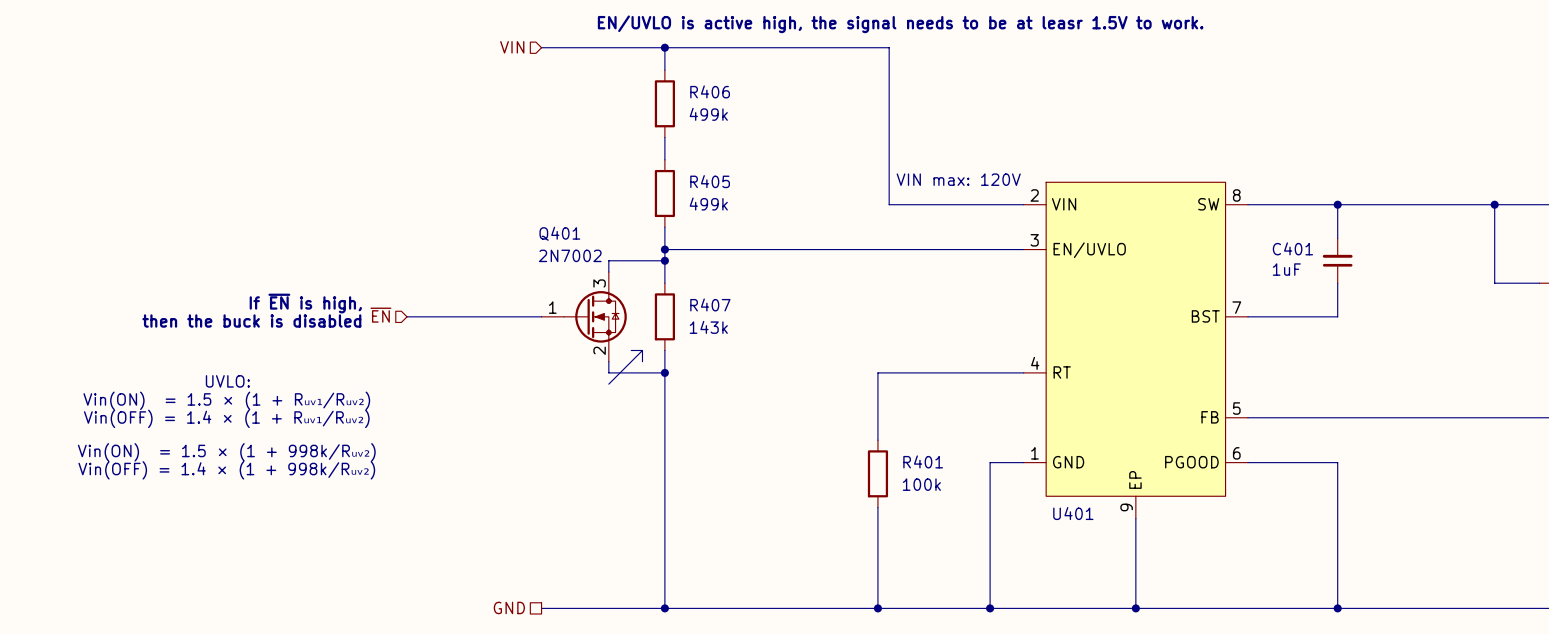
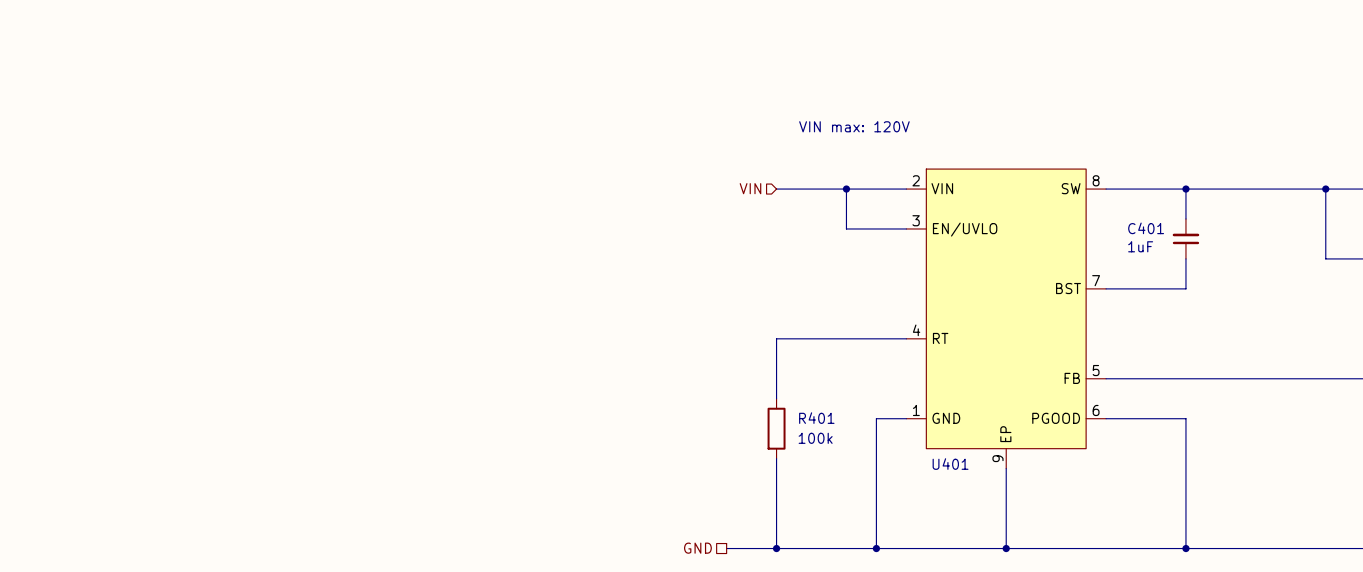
text: EN/UVLO is active high, the signal needs to be at leasr 1.5V to work. (900, 24) -> none
hierarchical label: VIN (512, 47) -> none
wire: (541, 47) (889, 47) (889, 204) -> (776, 189) (786, 189)
wire: (664, 47) (664, 70) -> none
junction: (664, 47) -> none
R406: 499k (664, 103) -> none
wire: (664, 137) (664, 159) -> none
text position: VIN max: 120V (958, 179) -> VIN max: 120V (854, 126)
R405: 499k (664, 193) -> none
hierarchical label: none -> VIN (750, 188)
junction: none -> (846, 189)
wire: (664, 227) (664, 283) -> none
wire: (664, 249) (956, 249) -> (846, 189) (846, 228)
junction: (664, 249) -> none
wire: (664, 260) (608, 260) (608, 271) -> none
junction: (664, 260) -> none
text: If ~{EN} is high, (305, 303) -> none
hierarchical label: ~{EN} (380, 315) -> none
wire: (406, 316) (541, 316) -> none
Q401: 2N7002 (584, 316) -> none
R407: 143k (664, 316) -> none
text: then the buck is disabled (251, 321) -> none
line: (631, 350) (642, 350) -> none
line: (642, 350) (608, 384) -> none
line: (642, 350) (642, 361) -> none
wire: (664, 350) (664, 608) -> none
wire: (608, 361) (608, 372) (664, 372) -> none
junction: (664, 372) -> none
text: UVLO: (227, 381) -> none
text: Vin(ON) = 1.5 × (1 + Rᵤᵥ₁/Rᵤᵥ₂) (226, 400) -> none
text: Vin(OFF) = 1.4 × (1 + Rᵤᵥ₁/Rᵤᵥ₂) (226, 418) -> none
text: Vin(ON) = 1.5 × (1 + 998k/Rᵤᵥ₂) (226, 452) -> none
text: Vin(OFF) = 1.4 × (1 + 998k/Rᵤᵥ₂) (226, 470) -> none
hierarchical label: GND (509, 607) -> none
hierarchical label: none -> GND (697, 548)
wire: (541, 608) (821, 608) -> none
junction: (664, 608) -> none

